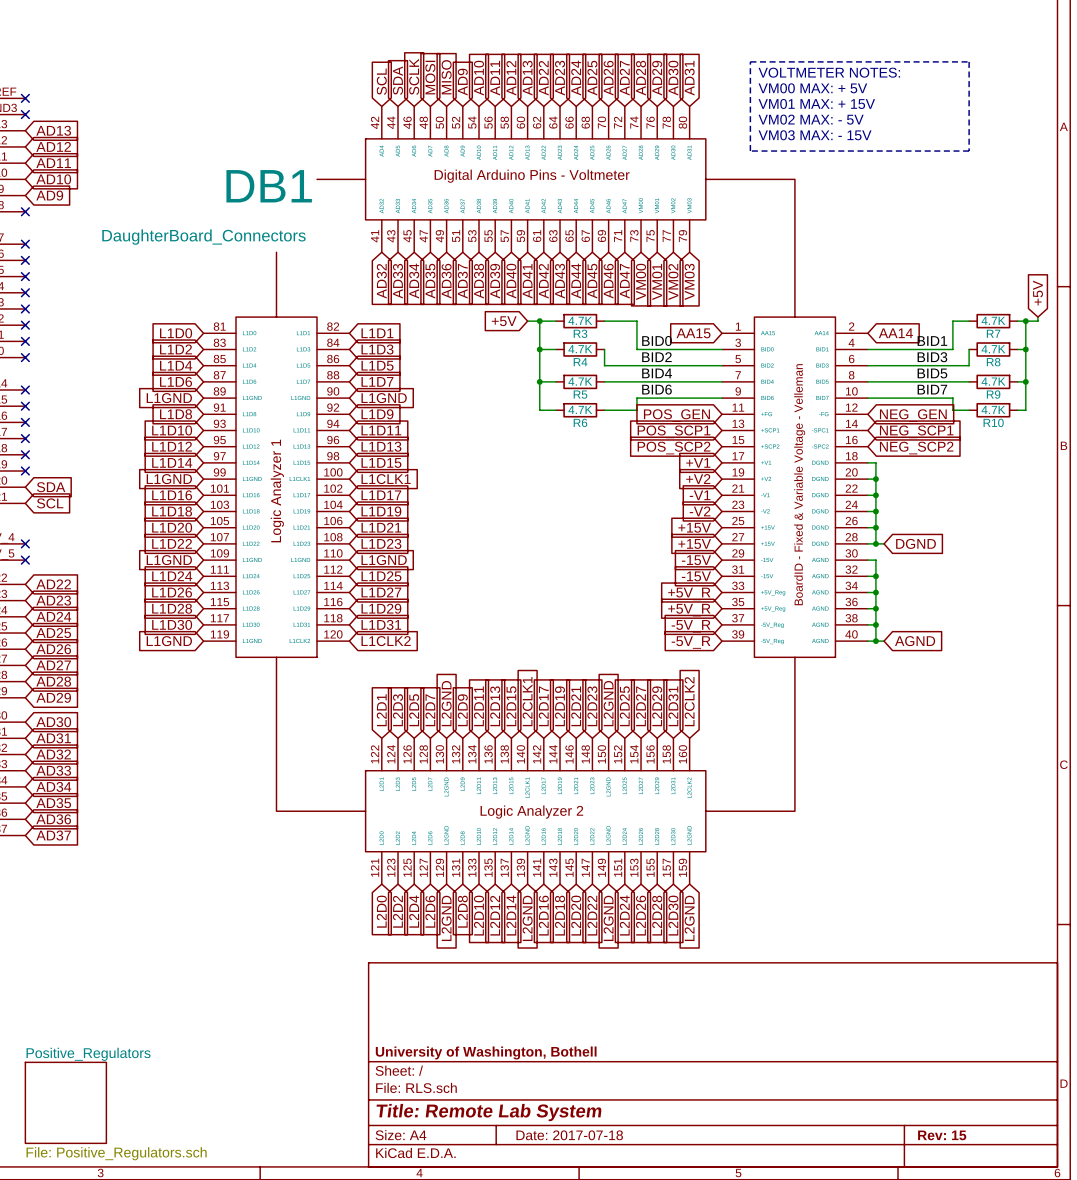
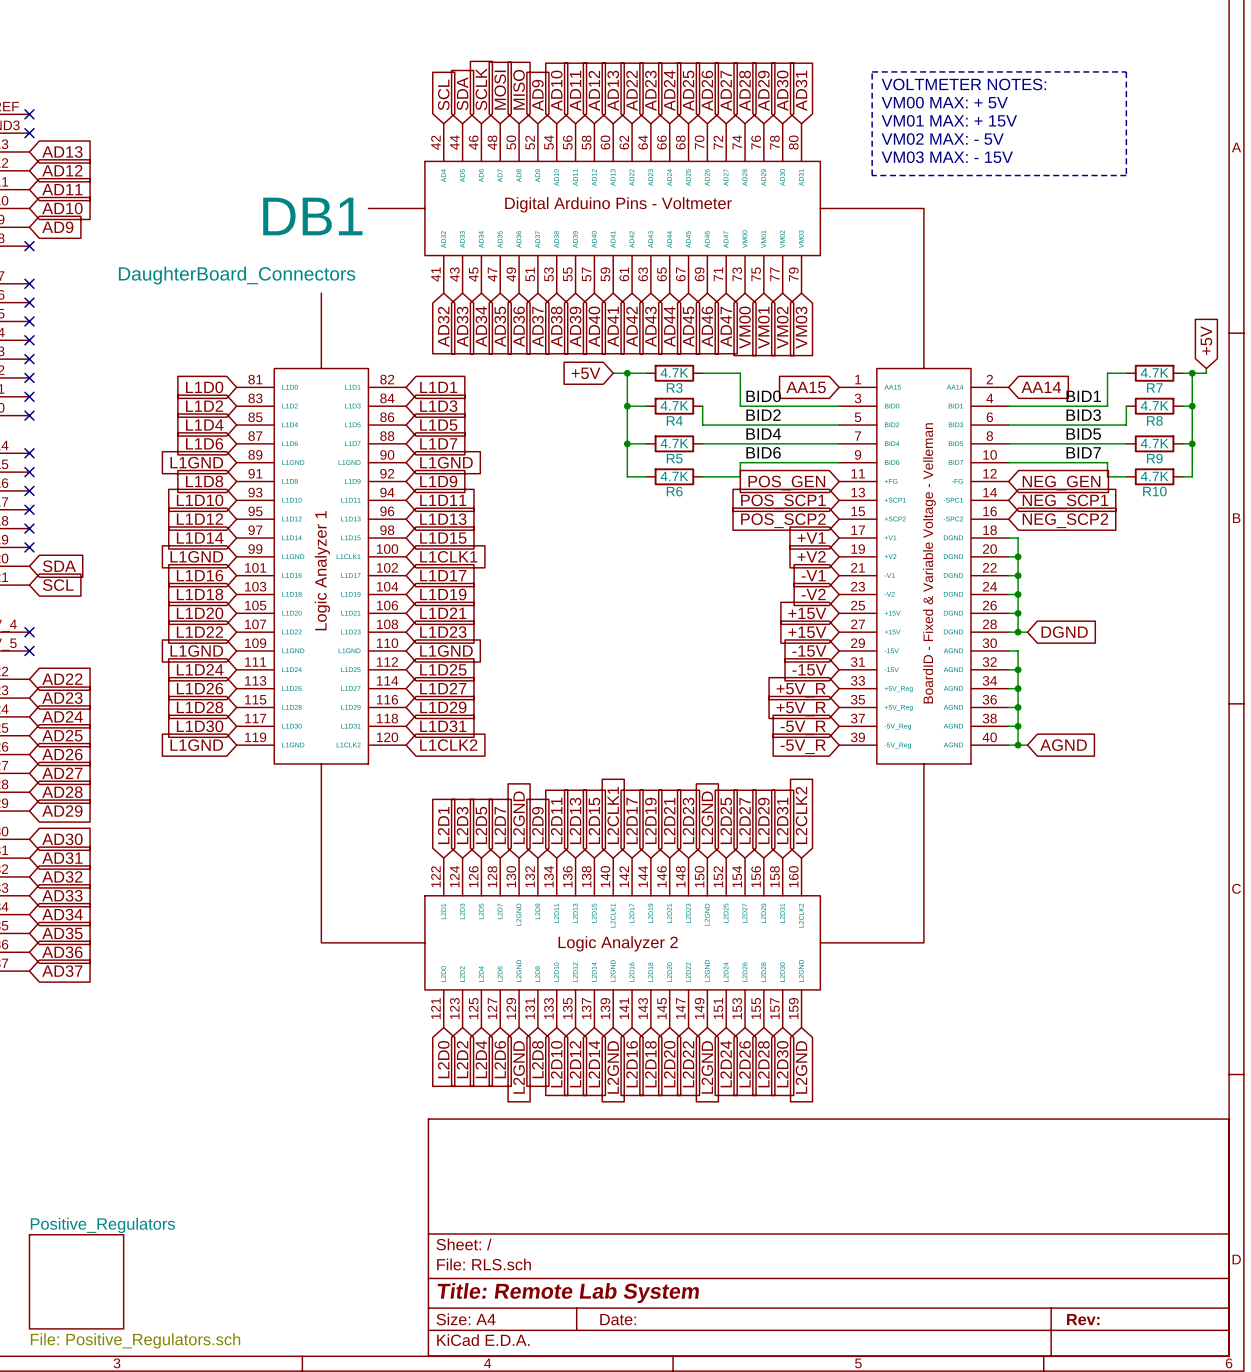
title block: University of Washington, Bothell (486, 1052) -> none
title block: Date: 2017-07-18 (569, 1135) -> Date: (618, 1319)
title block: Rev: 15 (942, 1135) -> Rev: (1083, 1319)

